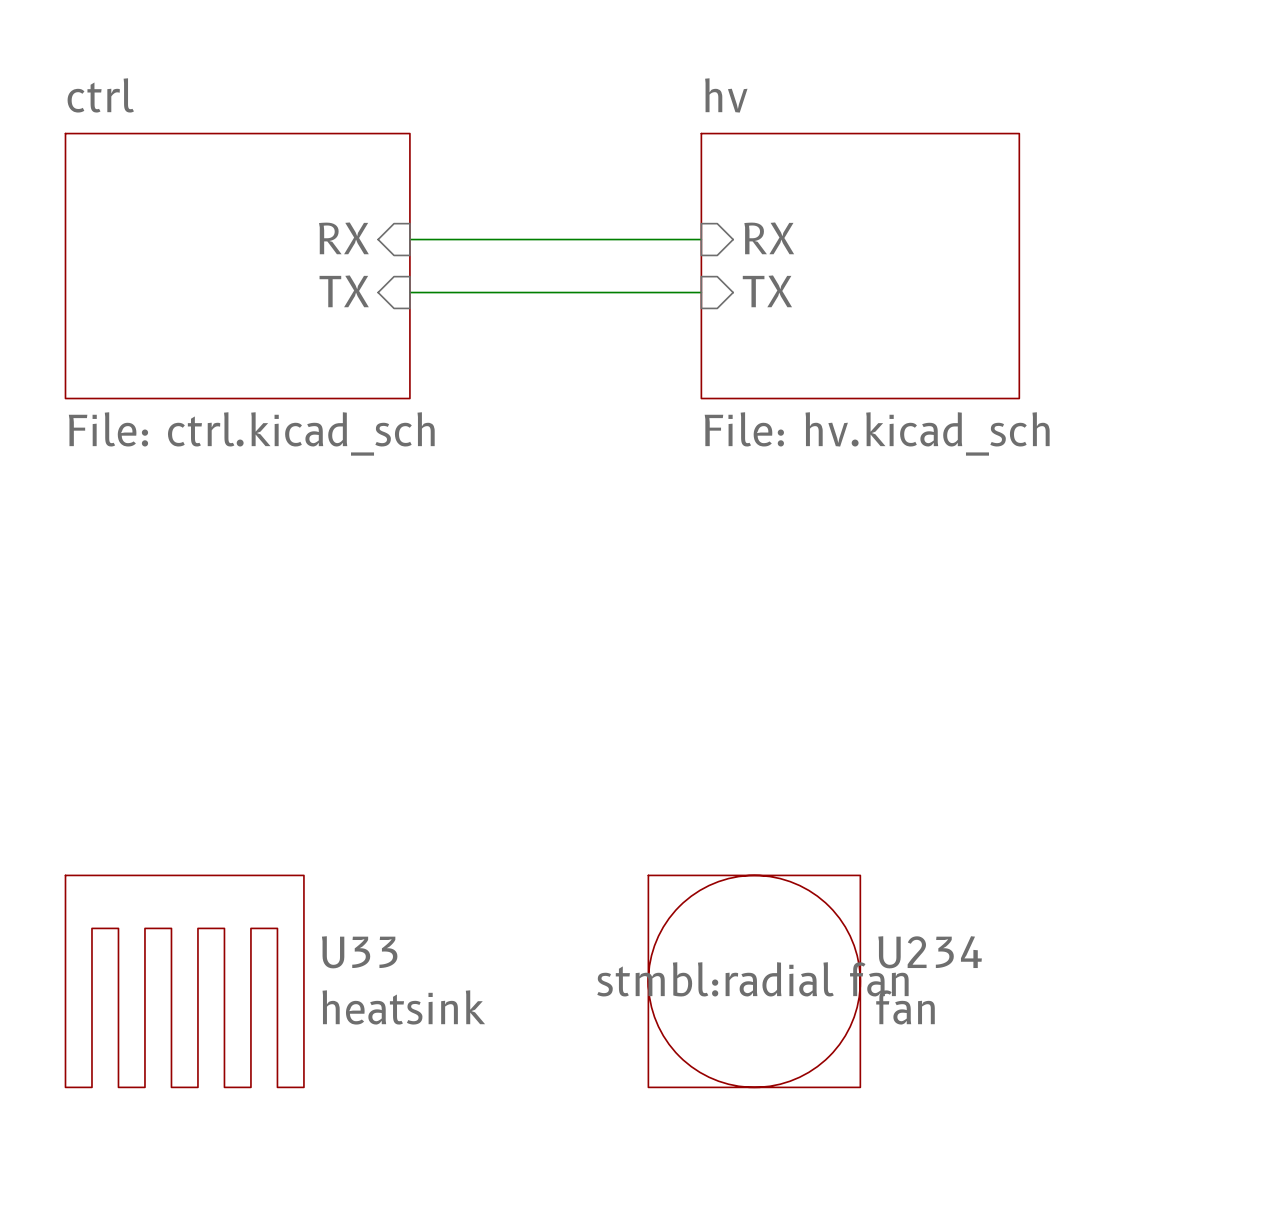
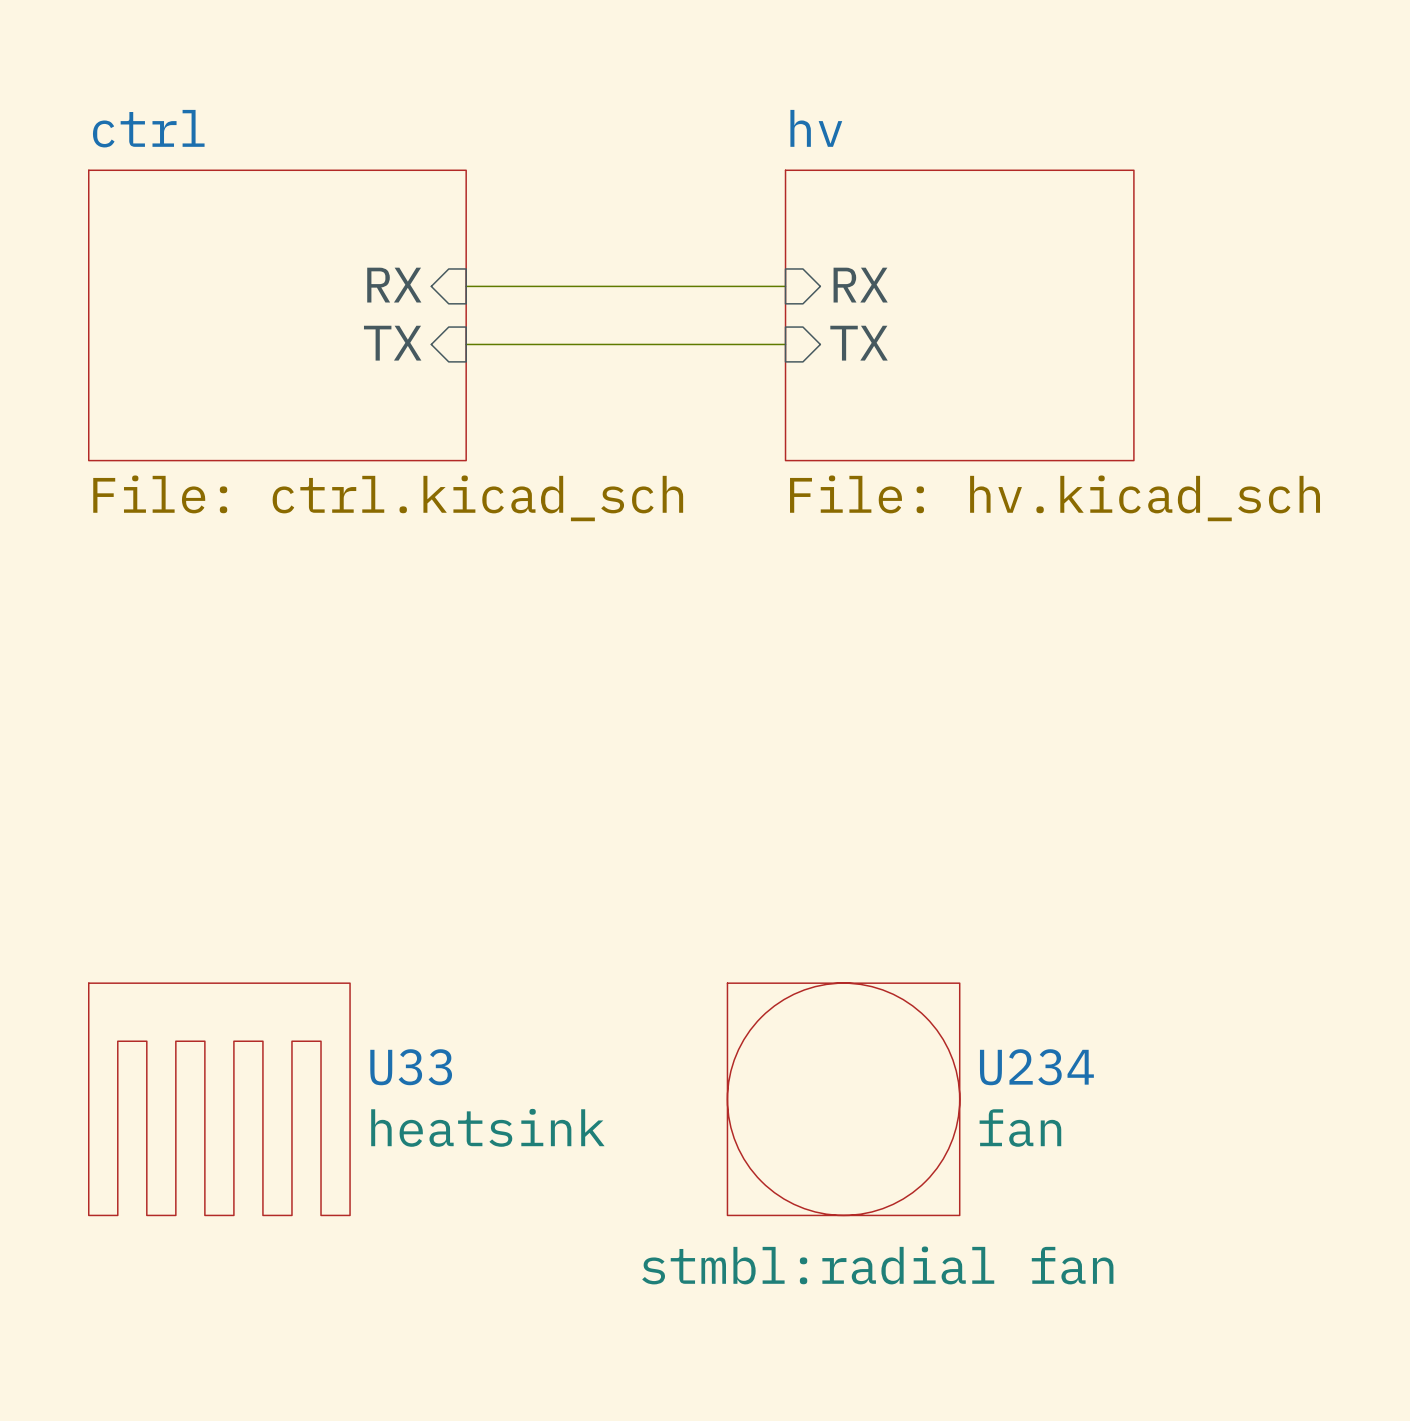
U234 text position: stmbl:radial fan (752, 979) -> stmbl:radial fan (877, 1265)

